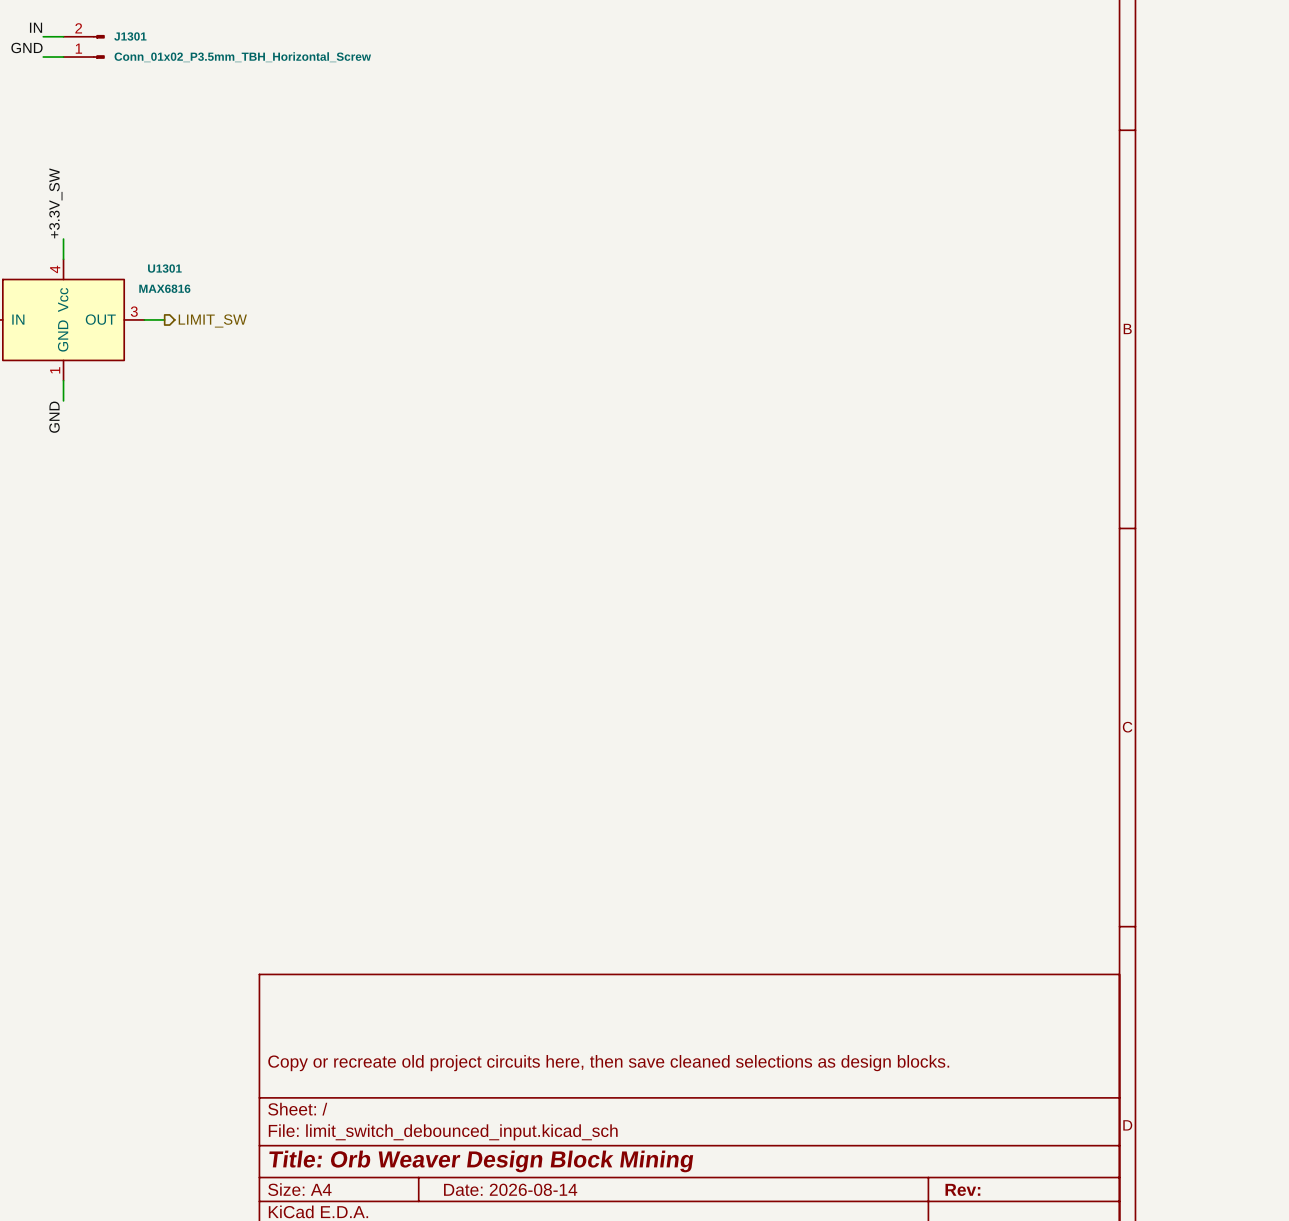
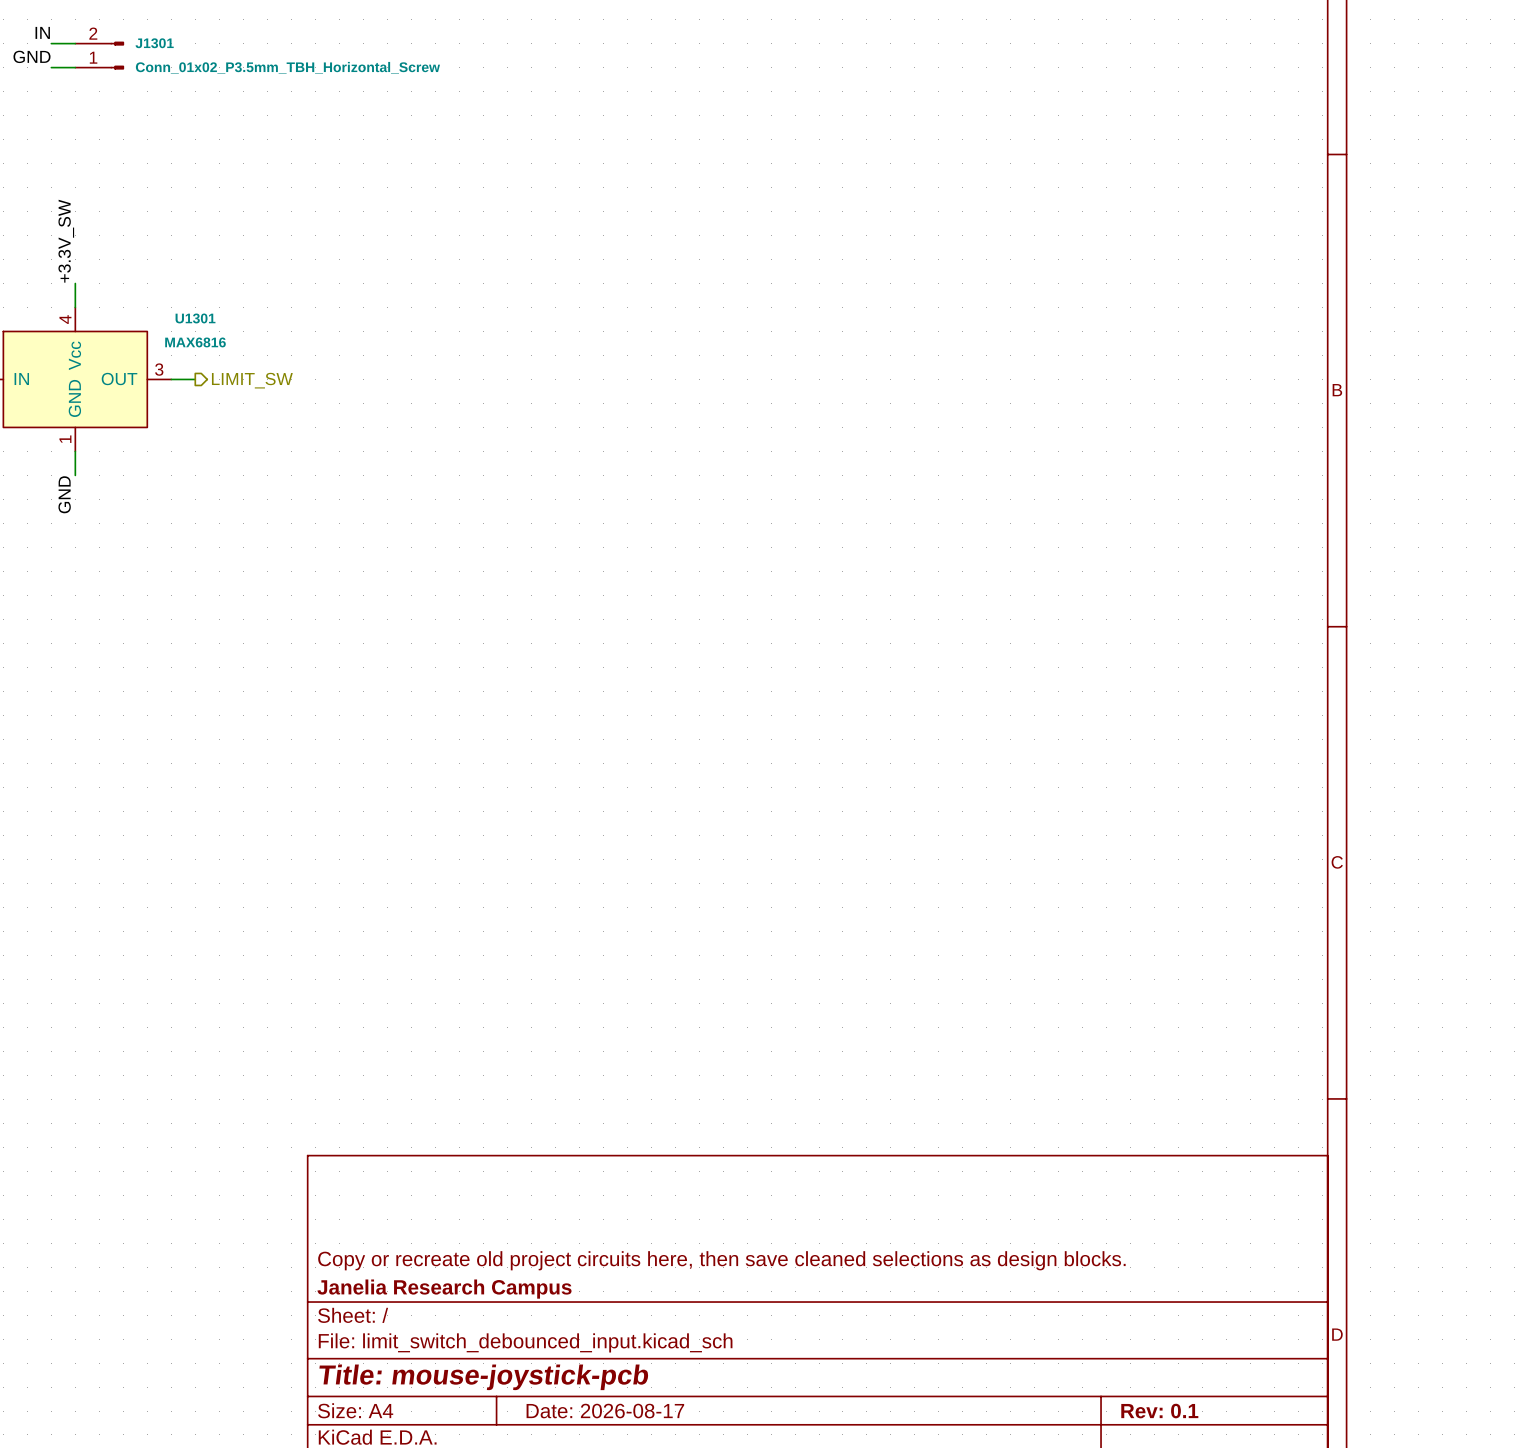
title block: none -> Janelia Research Campus (444, 1289)
title block: Title: Orb Weaver Design Block Mining (481, 1161) -> Title: mouse-joystick-pcb (483, 1377)
title block: Date: 2026-08-14 (510, 1189) -> Date: 2026-08-17 (605, 1411)
title block: Rev: (962, 1189) -> Rev: 0.1 (1159, 1411)

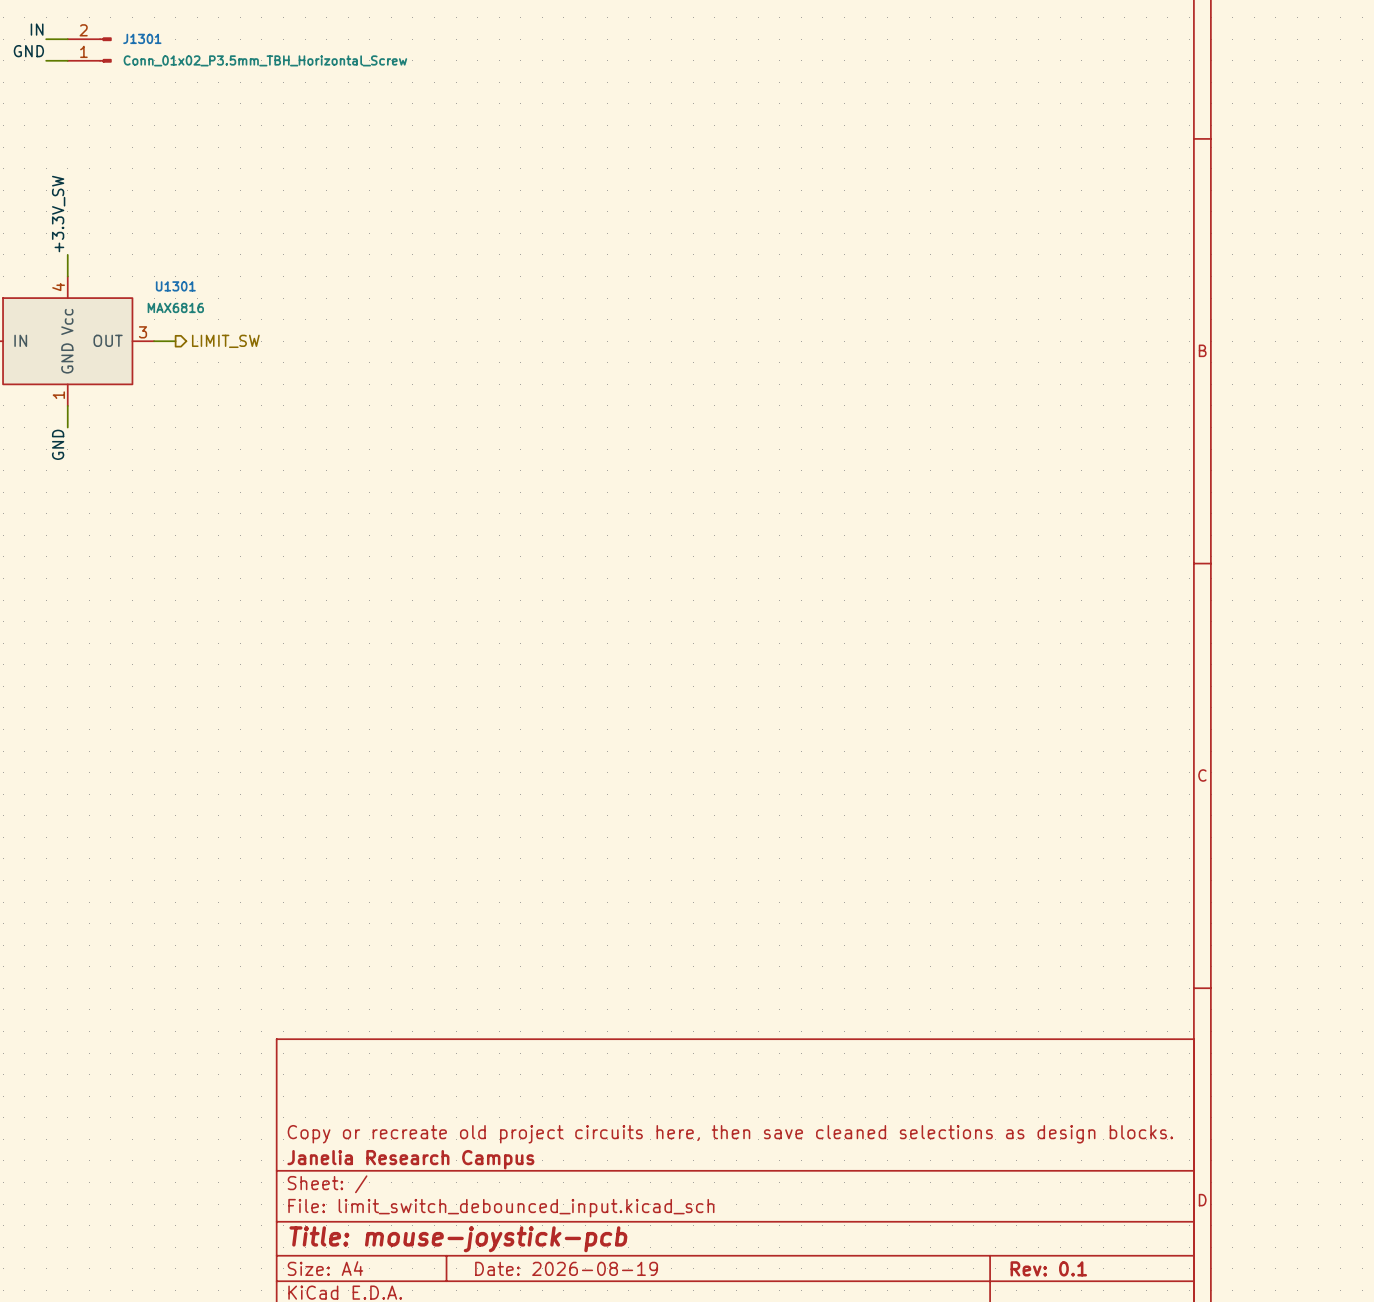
title block: Date: 2026-08-17 (605, 1411) -> Date: 2026-08-19 (566, 1268)

